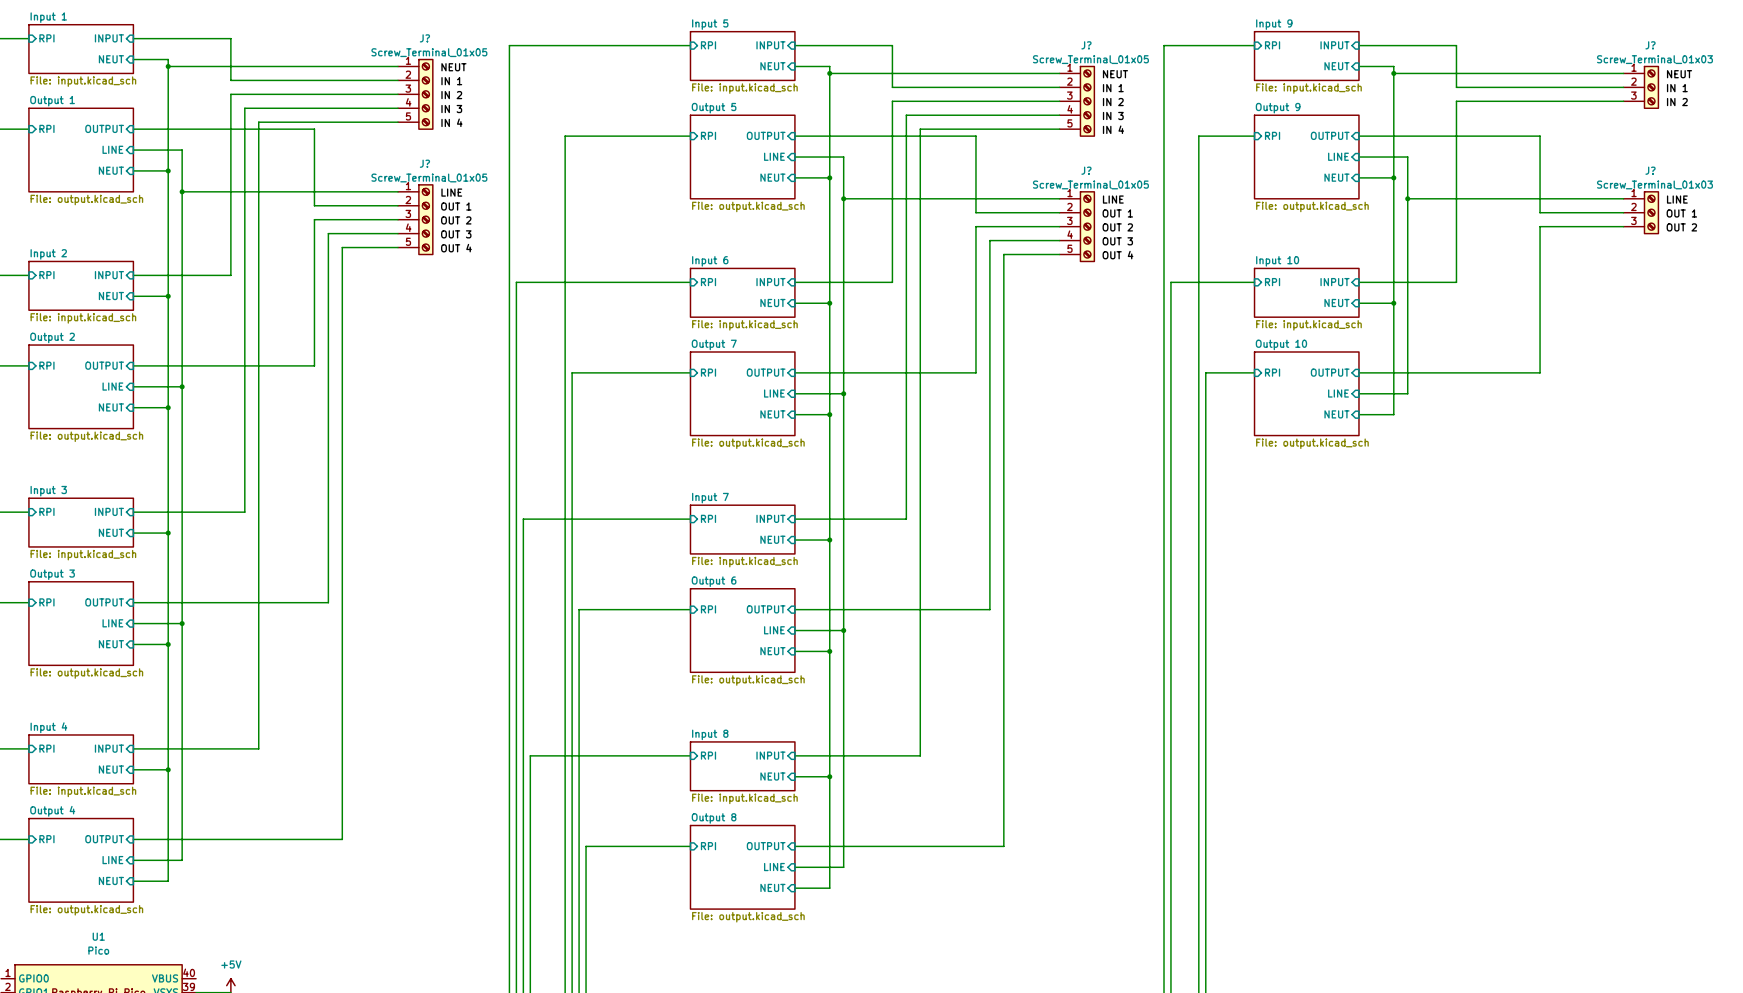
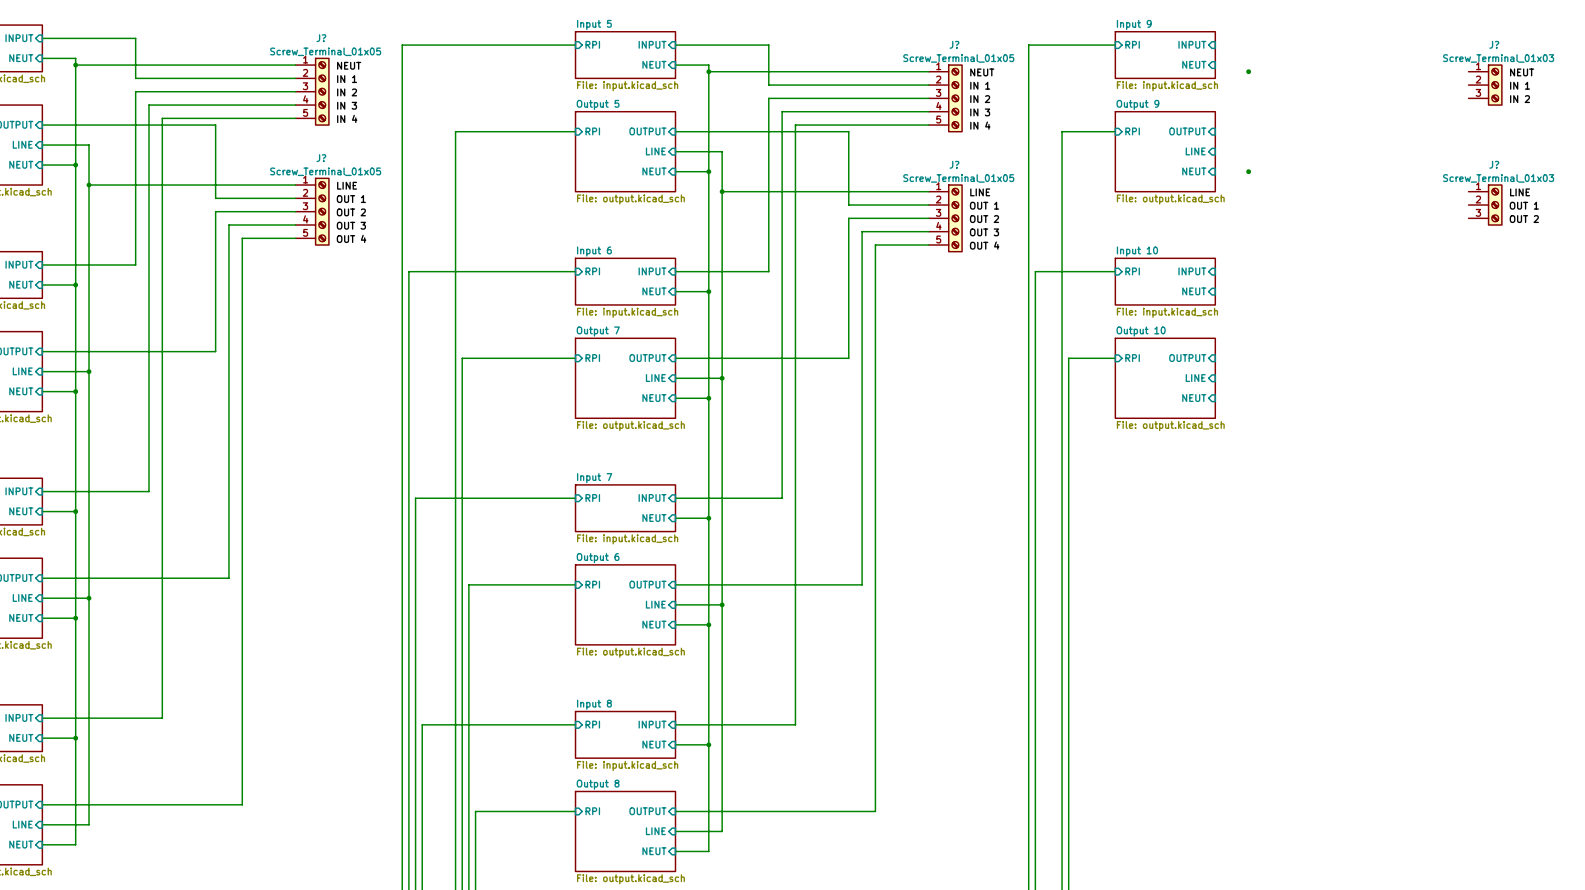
wire: (1358, 45) (1456, 45) (1456, 87) (1623, 87) -> none
wire: (1358, 66) (1393, 66) (1393, 414) (1358, 414) -> none
wire: (1393, 73) (1623, 73) -> none
wire: (1623, 101) (1456, 101) (1456, 282) (1358, 282) -> none
wire: (1358, 136) (1540, 136) (1540, 212) (1623, 212) -> none
wire: (1358, 157) (1407, 157) (1407, 393) (1358, 393) -> none
wire: (1358, 177) (1393, 177) -> none
wire: (1407, 198) (1623, 198) -> none
junction: (1407, 198) -> none
wire: (1623, 226) (1540, 226) (1540, 372) (1358, 372) -> none
wire: (1358, 303) (1393, 303) -> none
junction: (1393, 303) -> none

